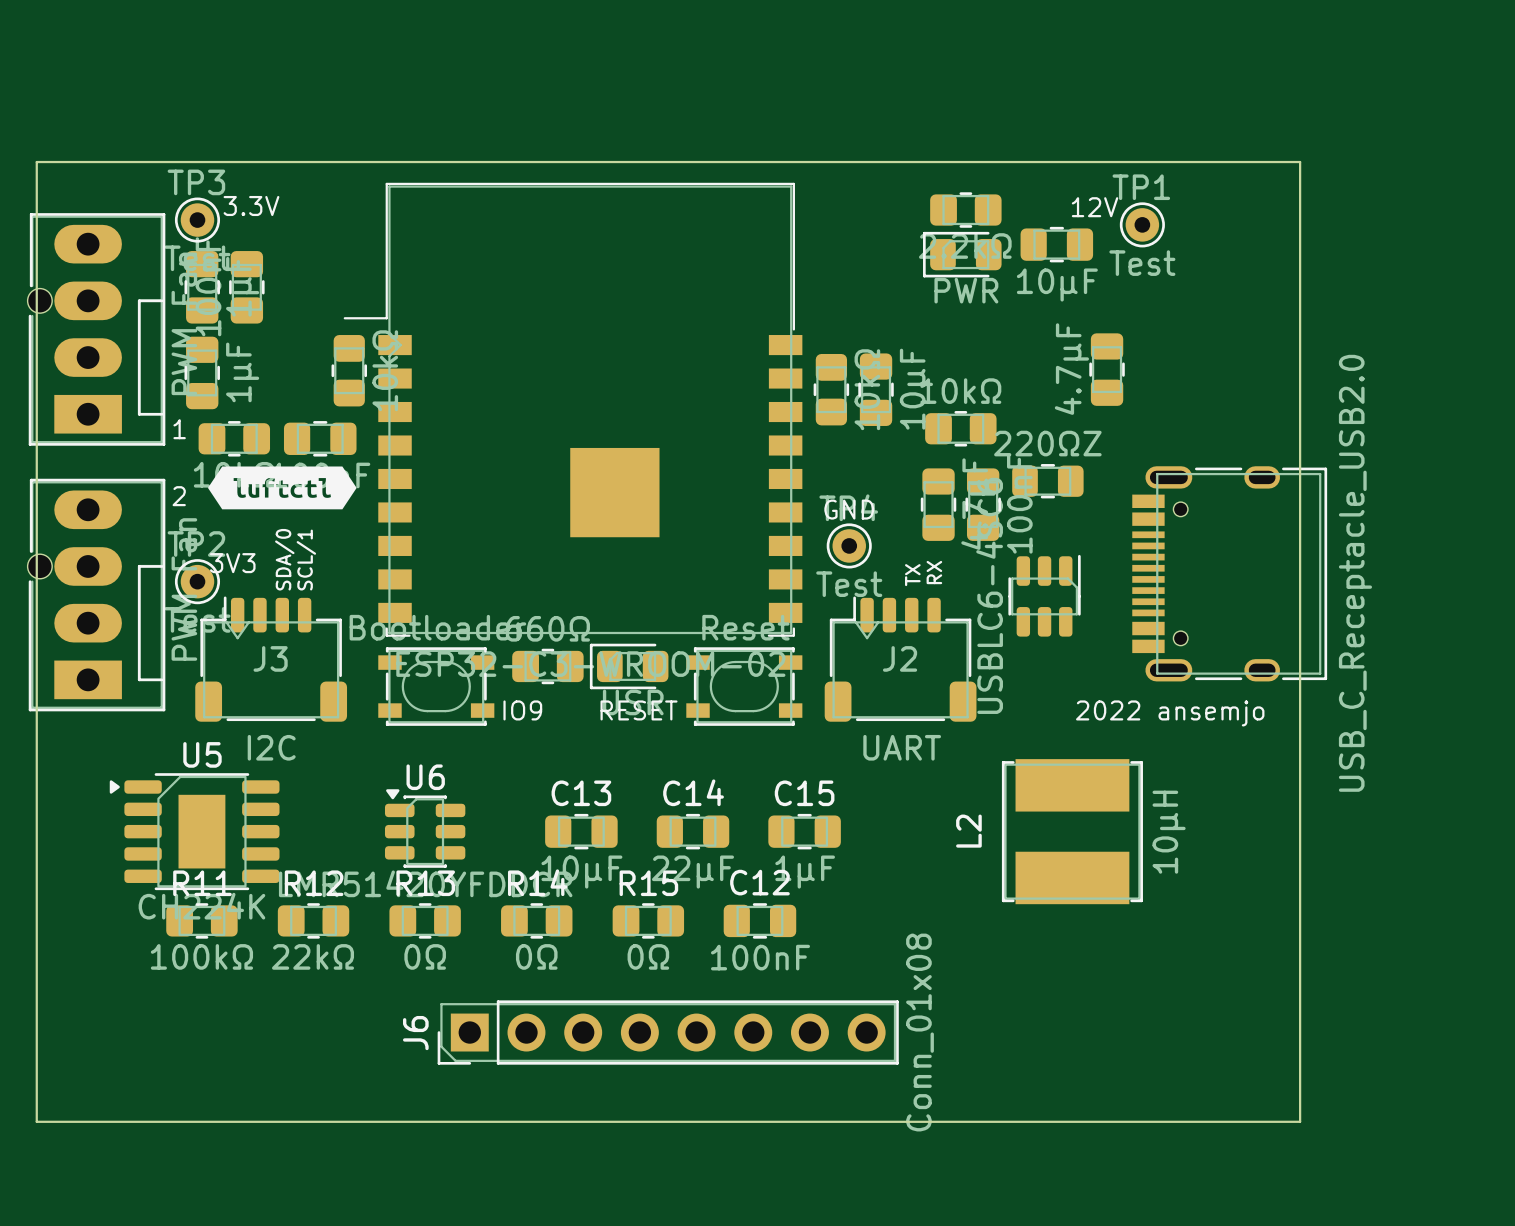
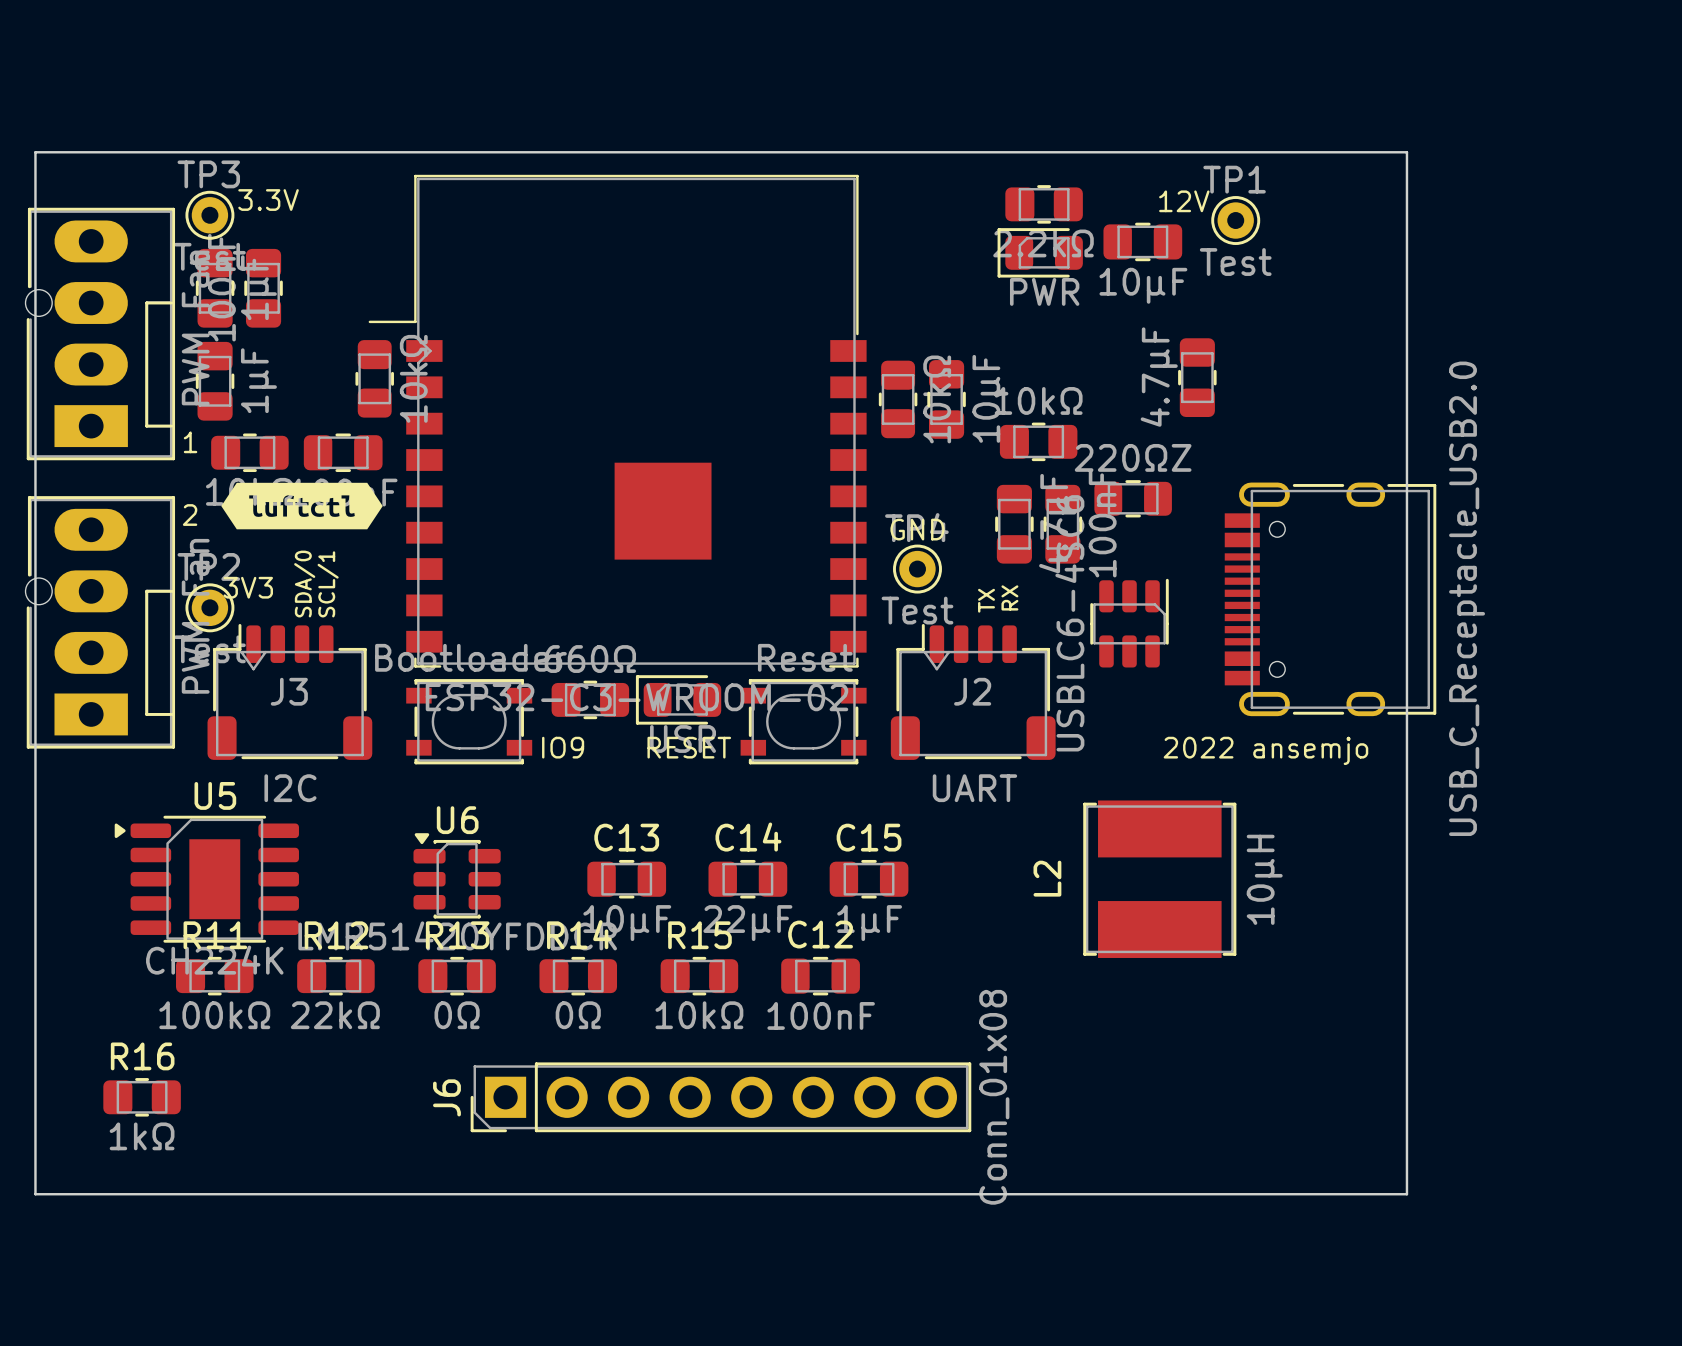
R15 value: 0Ω (648, 956) -> 10kΩ (699, 1015)
R16: none -> 1kΩ (142, 1097)

